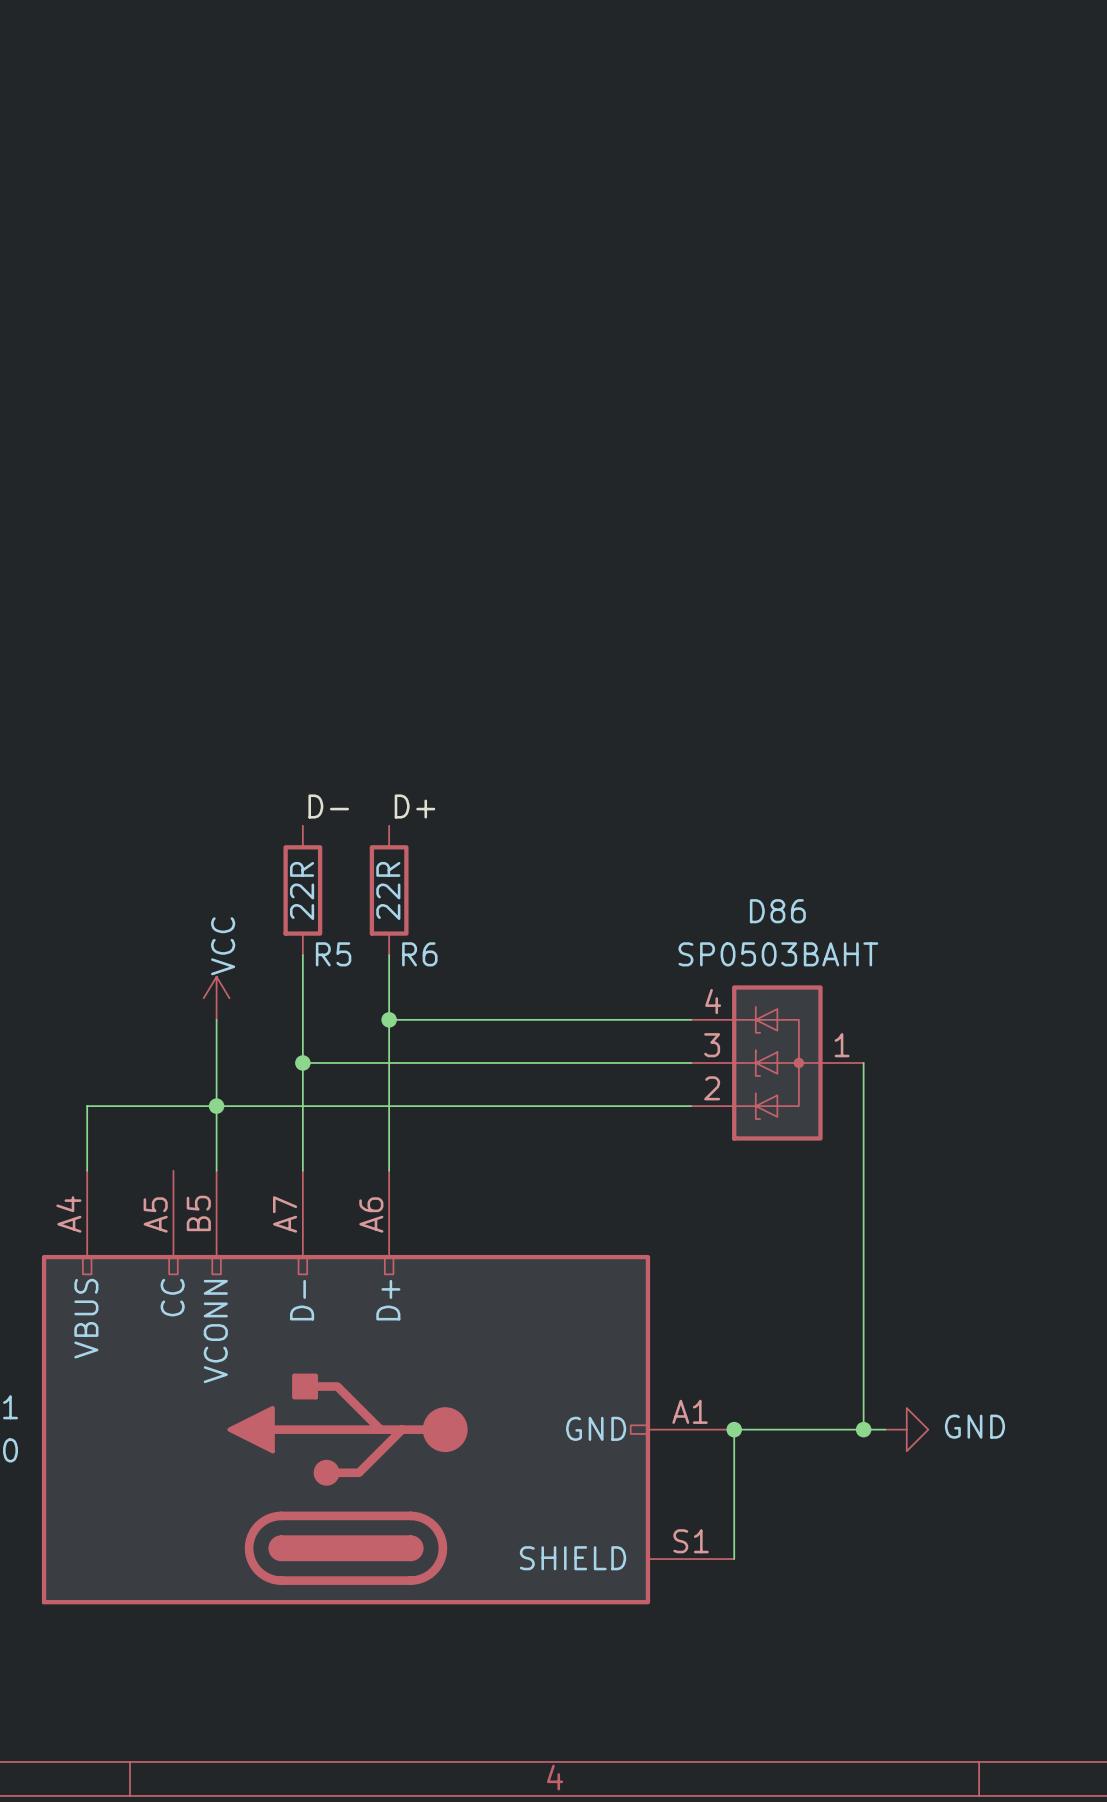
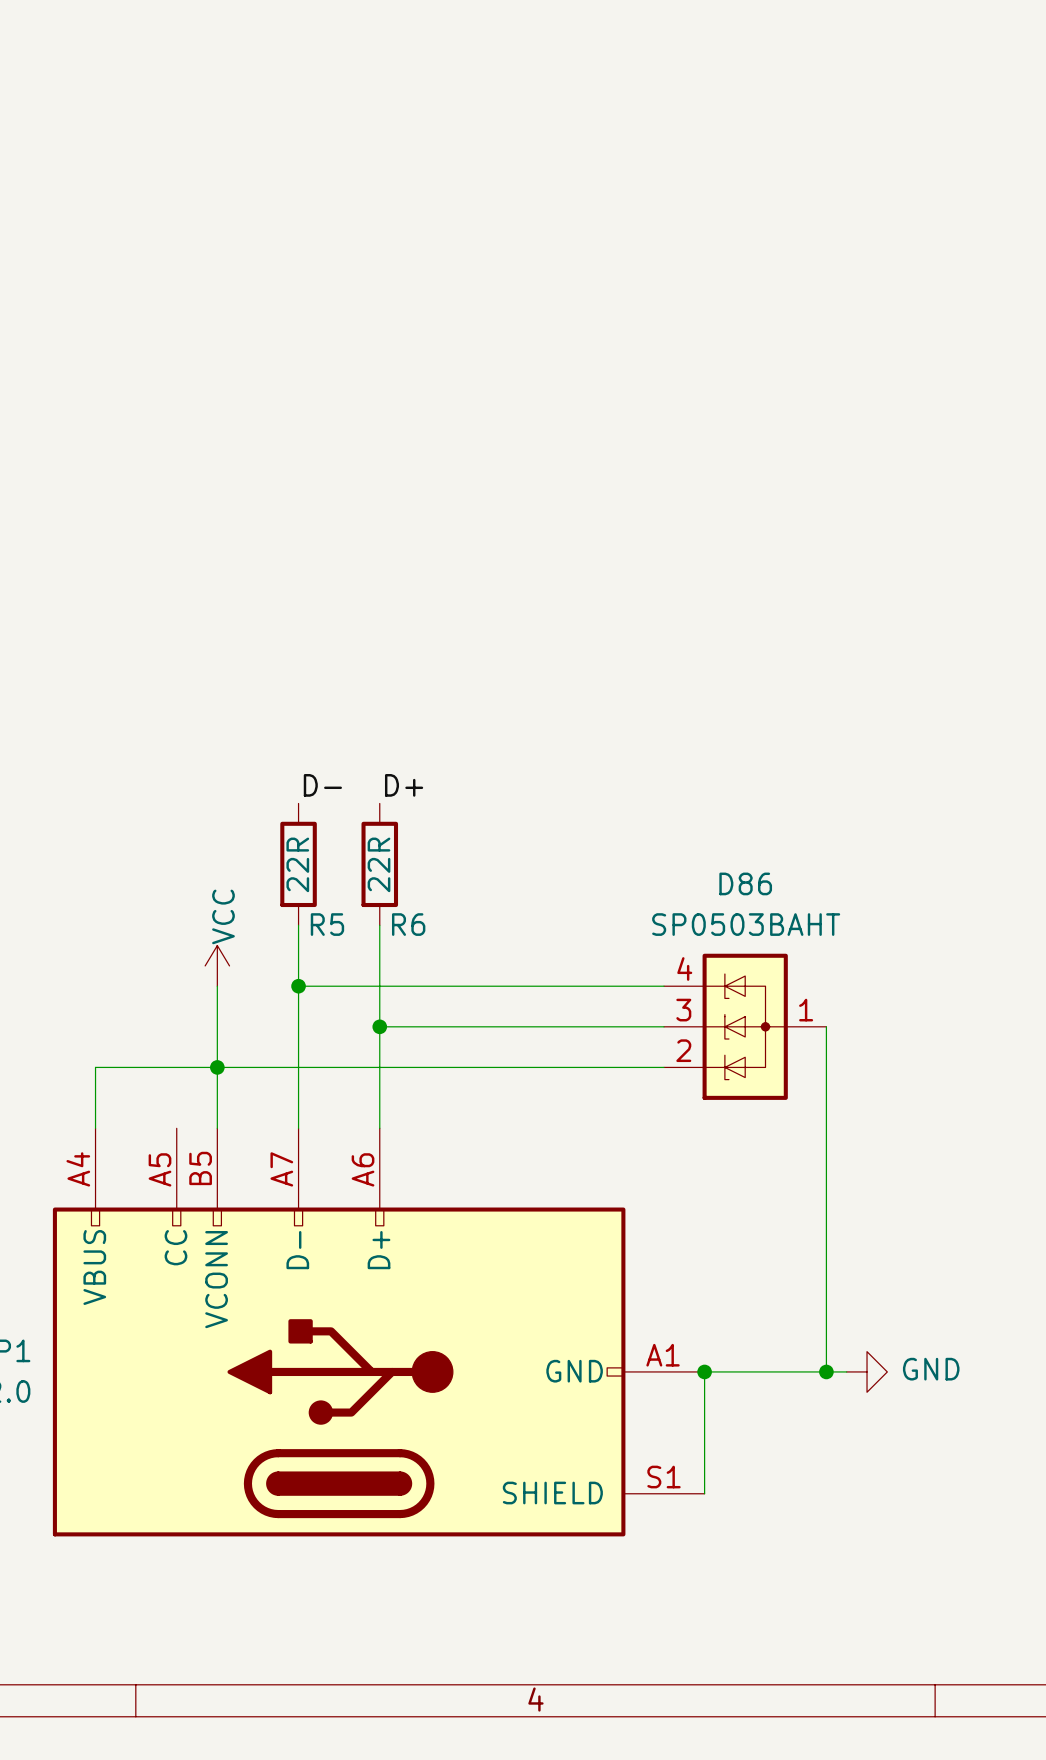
junction: none -> (298, 986)
junction: (389, 1019) -> none
wire: (302, 1062) (389, 1062) -> (298, 986) (379, 986)
junction: (302, 1062) -> none
junction: none -> (379, 1026)

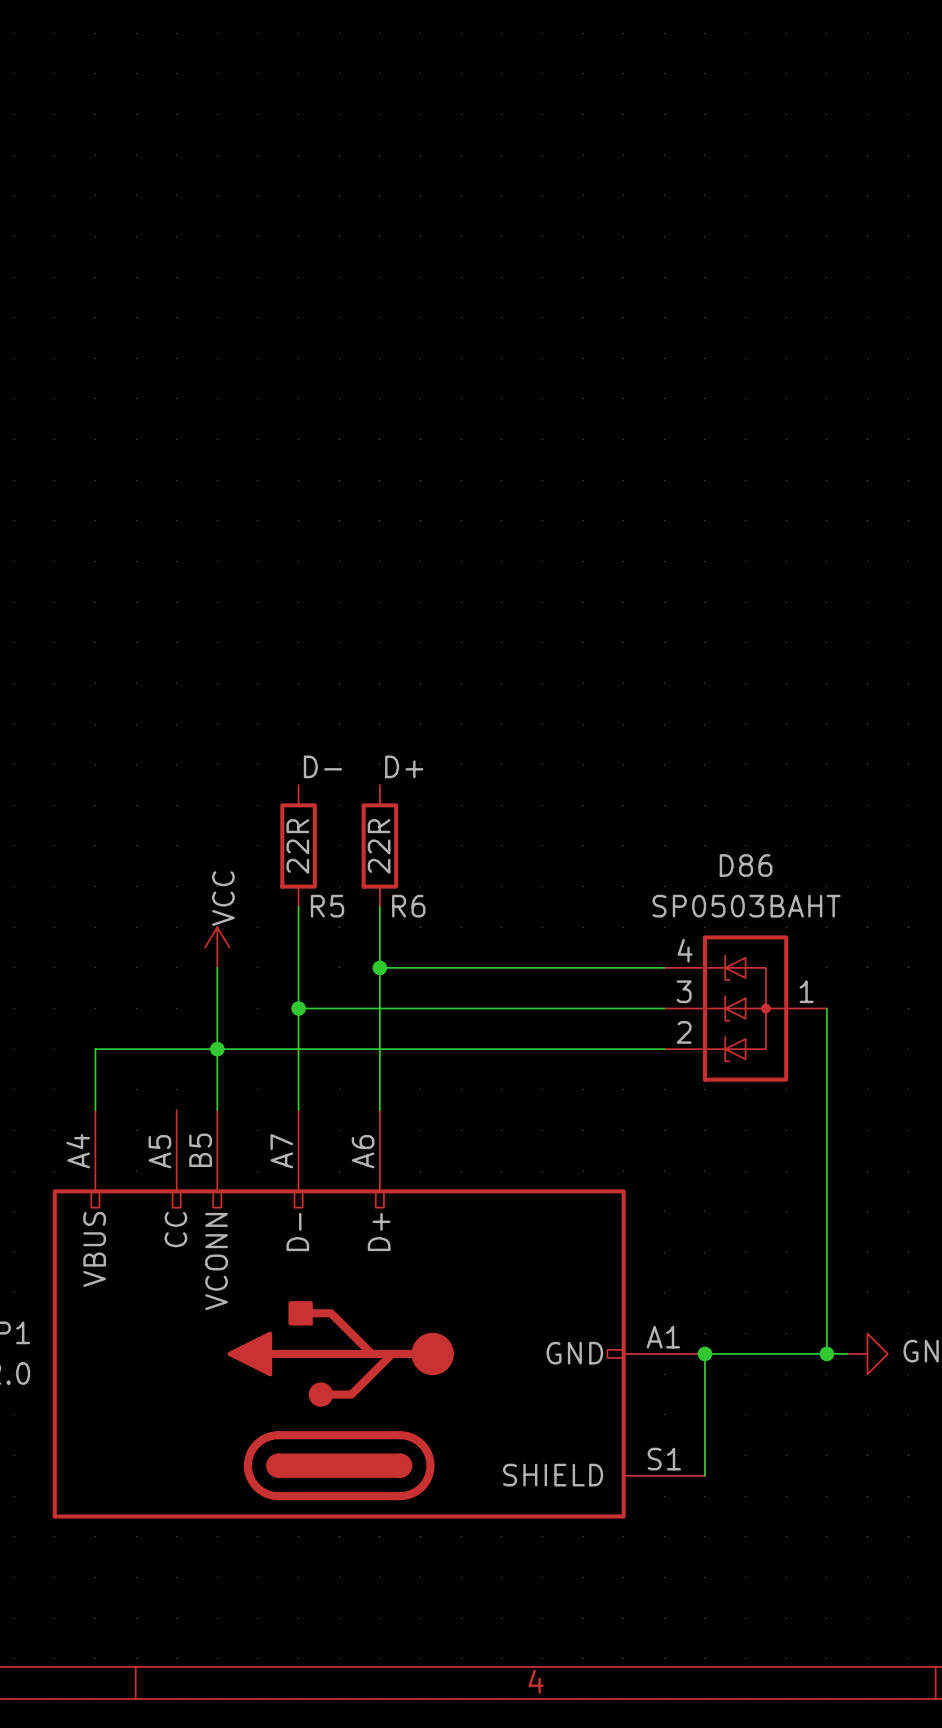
wire: (298, 986) (379, 986) -> (298, 1008) (379, 1008)
junction: (298, 986) -> none
junction: none -> (379, 967)
junction: none -> (298, 1008)
junction: (379, 1026) -> none

